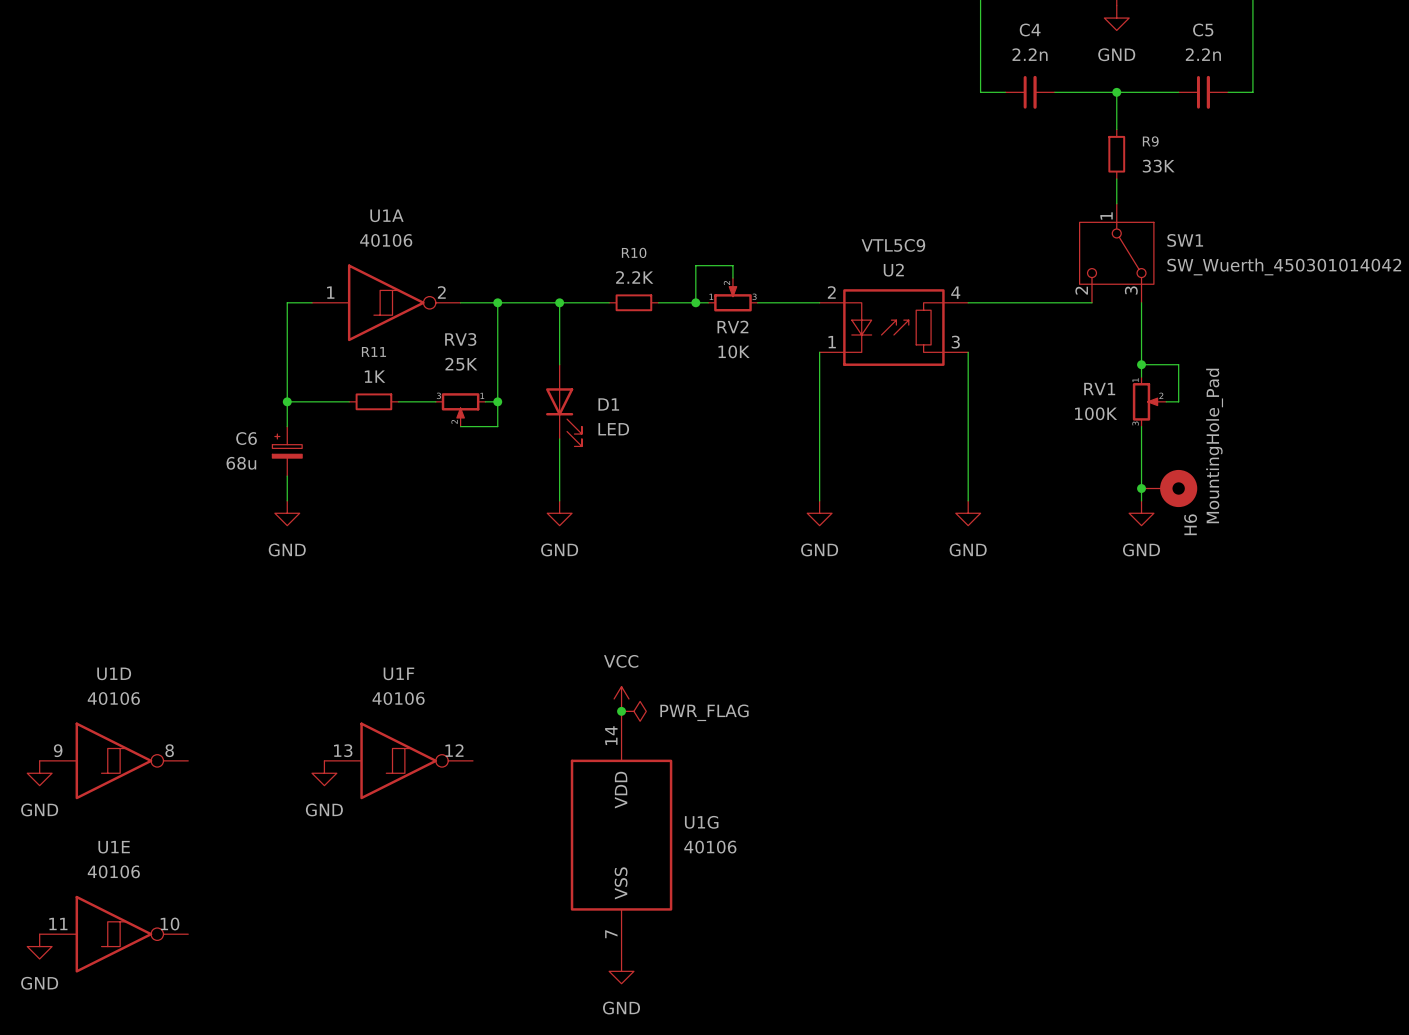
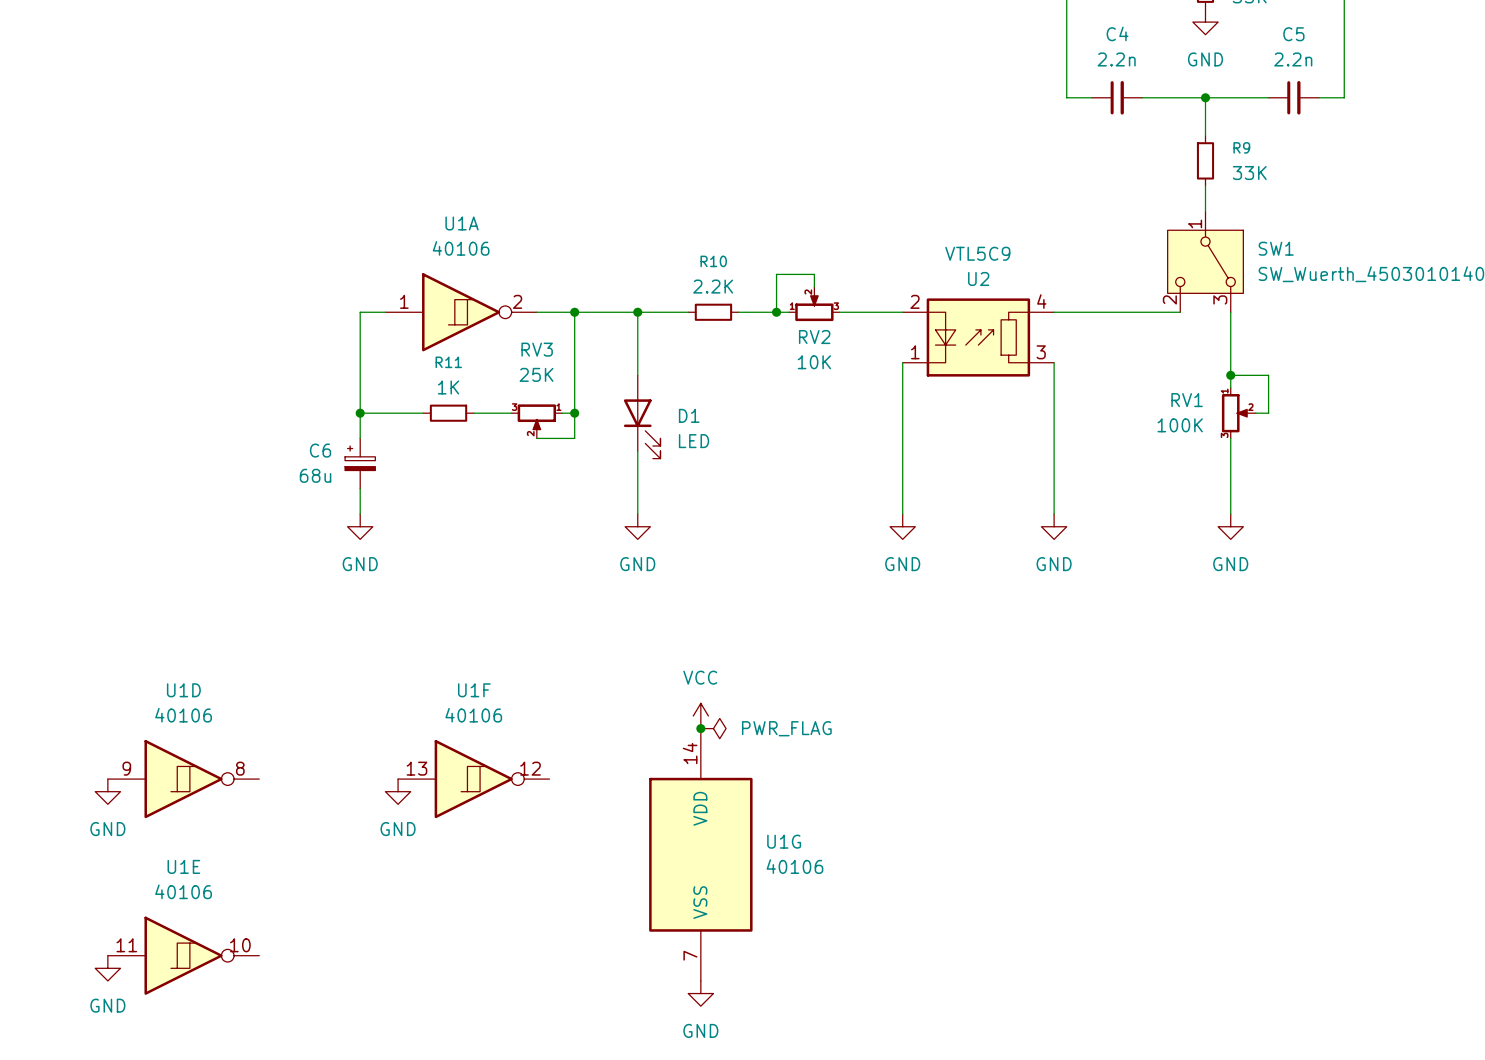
junction: (1141, 488) -> none
H6: MountingHole_Pad (1169, 488) -> none

